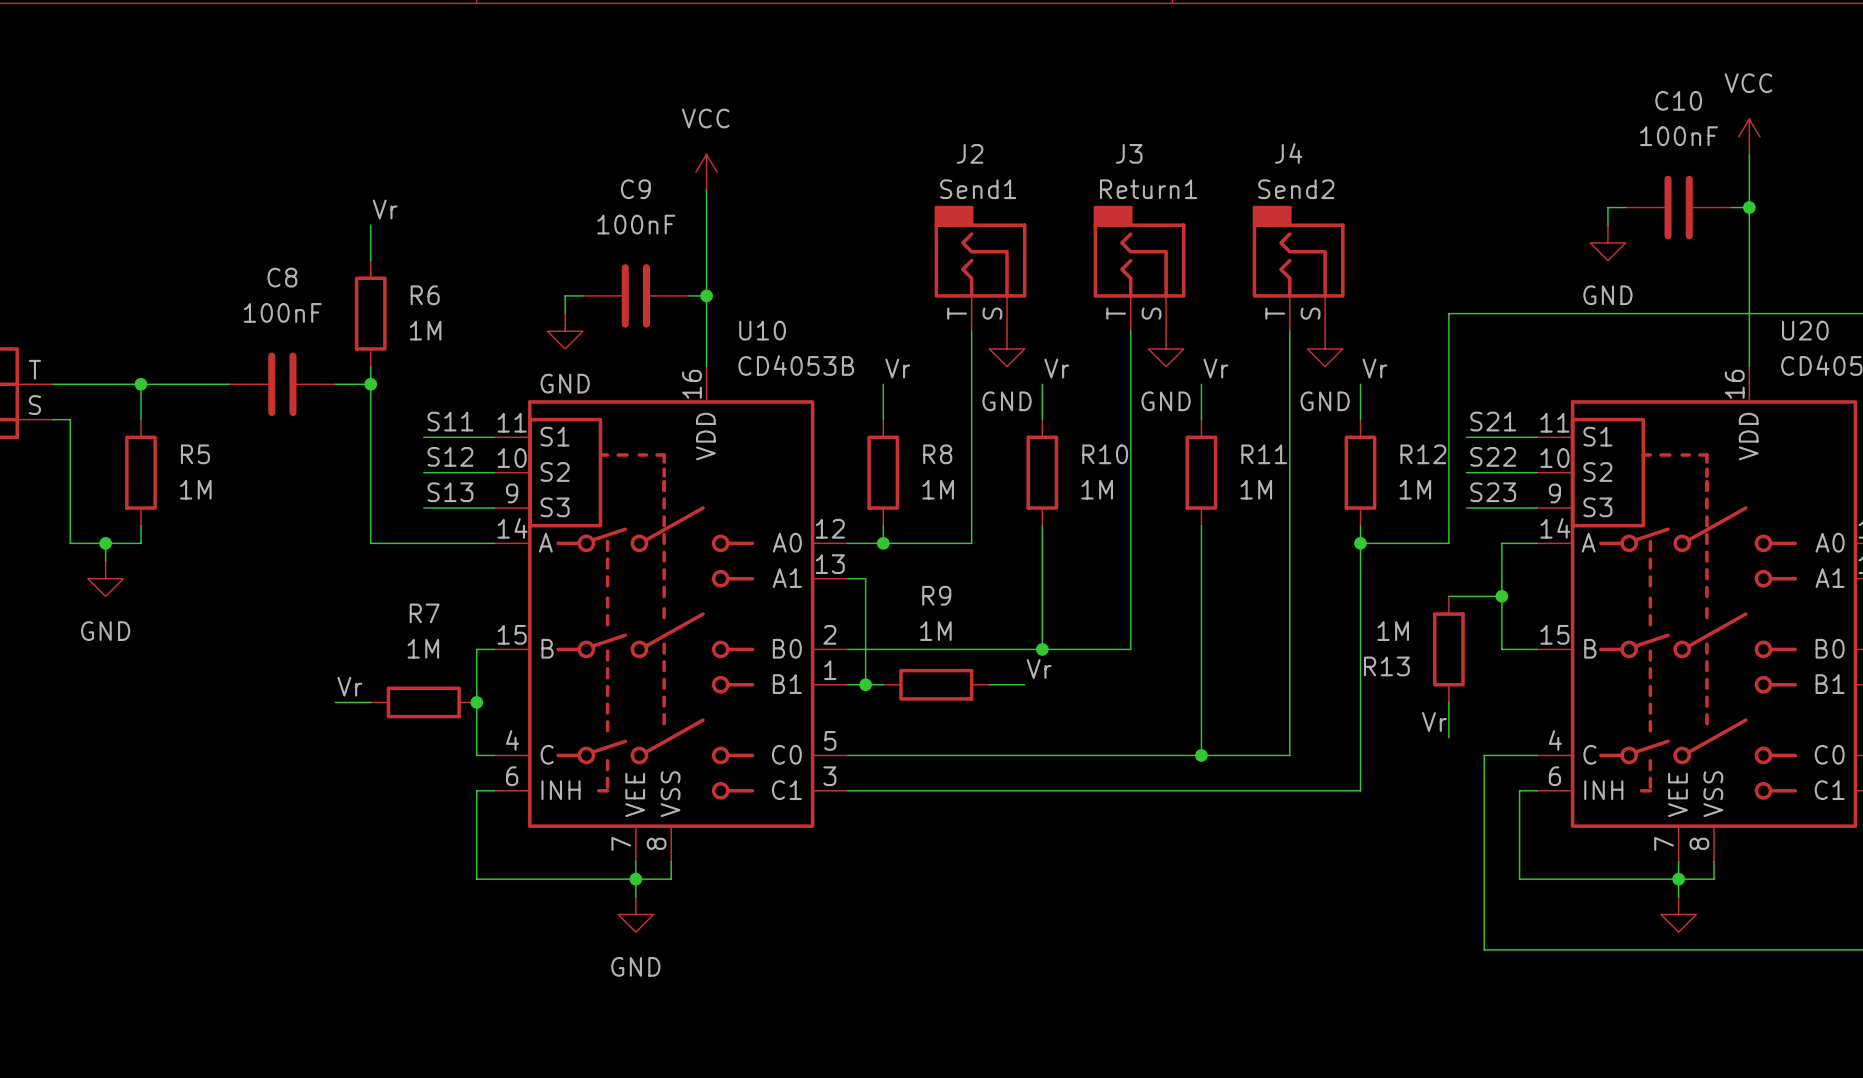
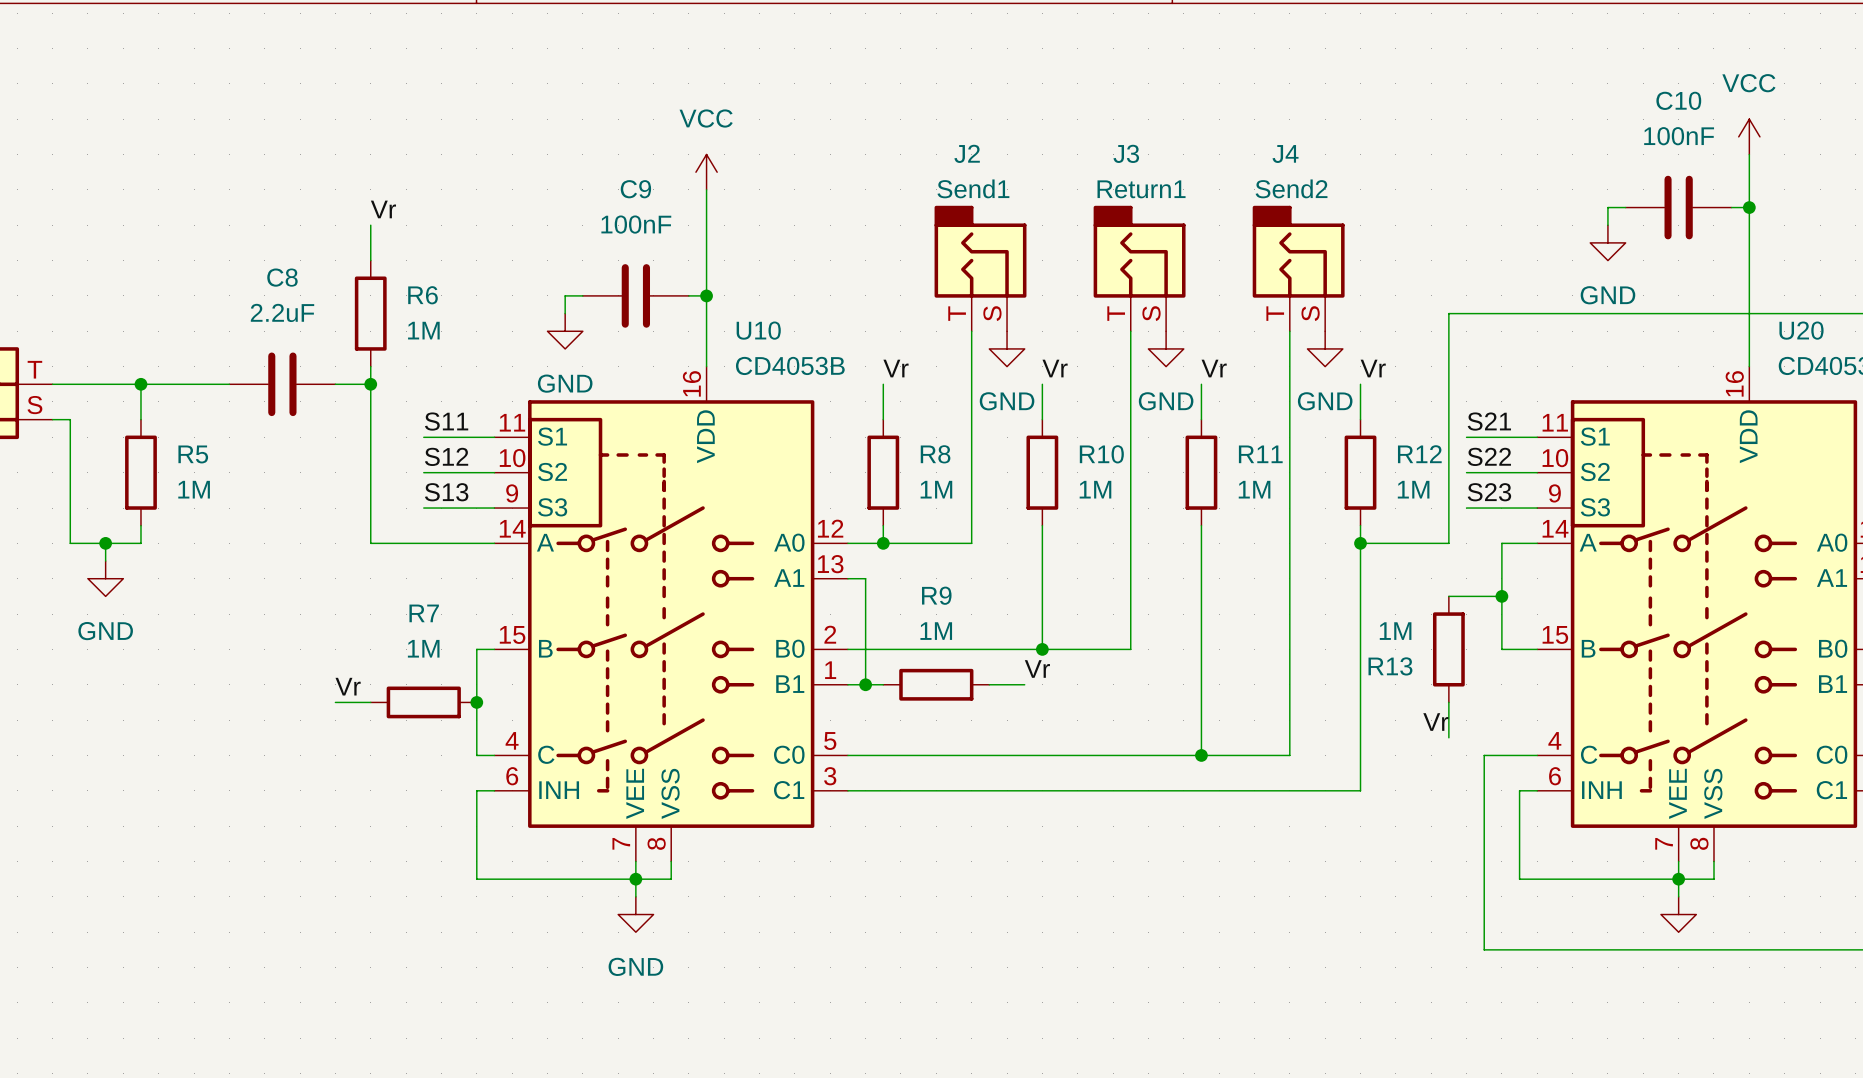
C8 value: 100nF (282, 312) -> 2.2uF (282, 312)

